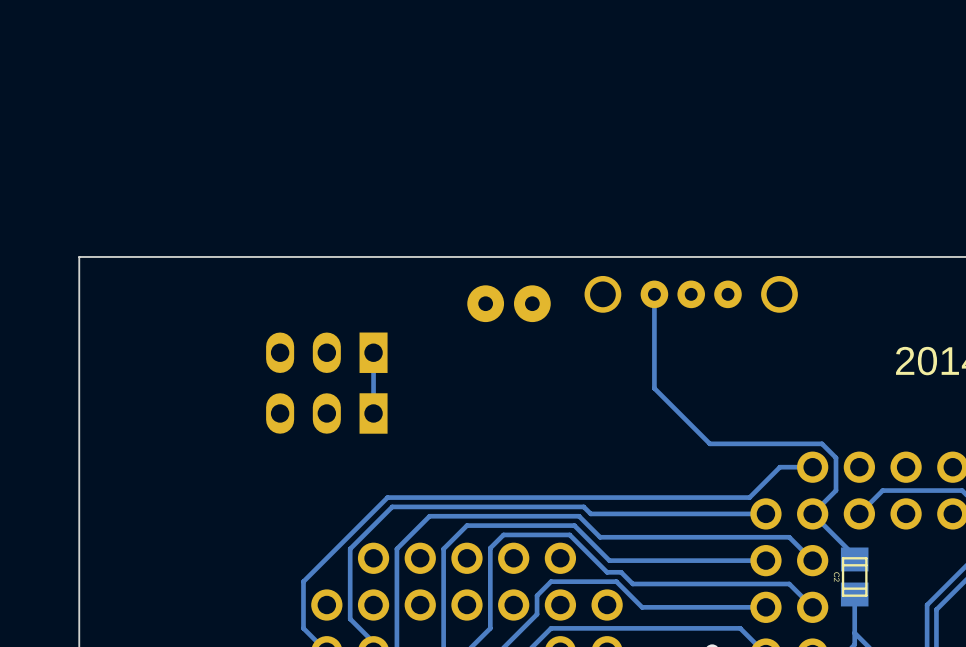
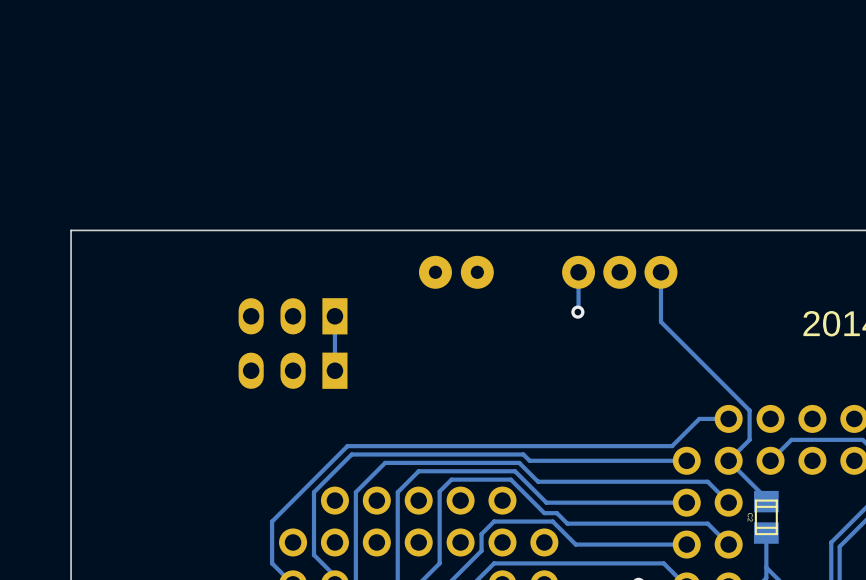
part footprint: [584, 275, 798, 313] -> [562, 255, 678, 289]
track: (654, 294) (654, 388) (709, 443) (822, 443) -> (660, 272) (660, 321) (737, 397)
track: none -> (578, 272) (577, 312)
via: none -> (577, 312)

